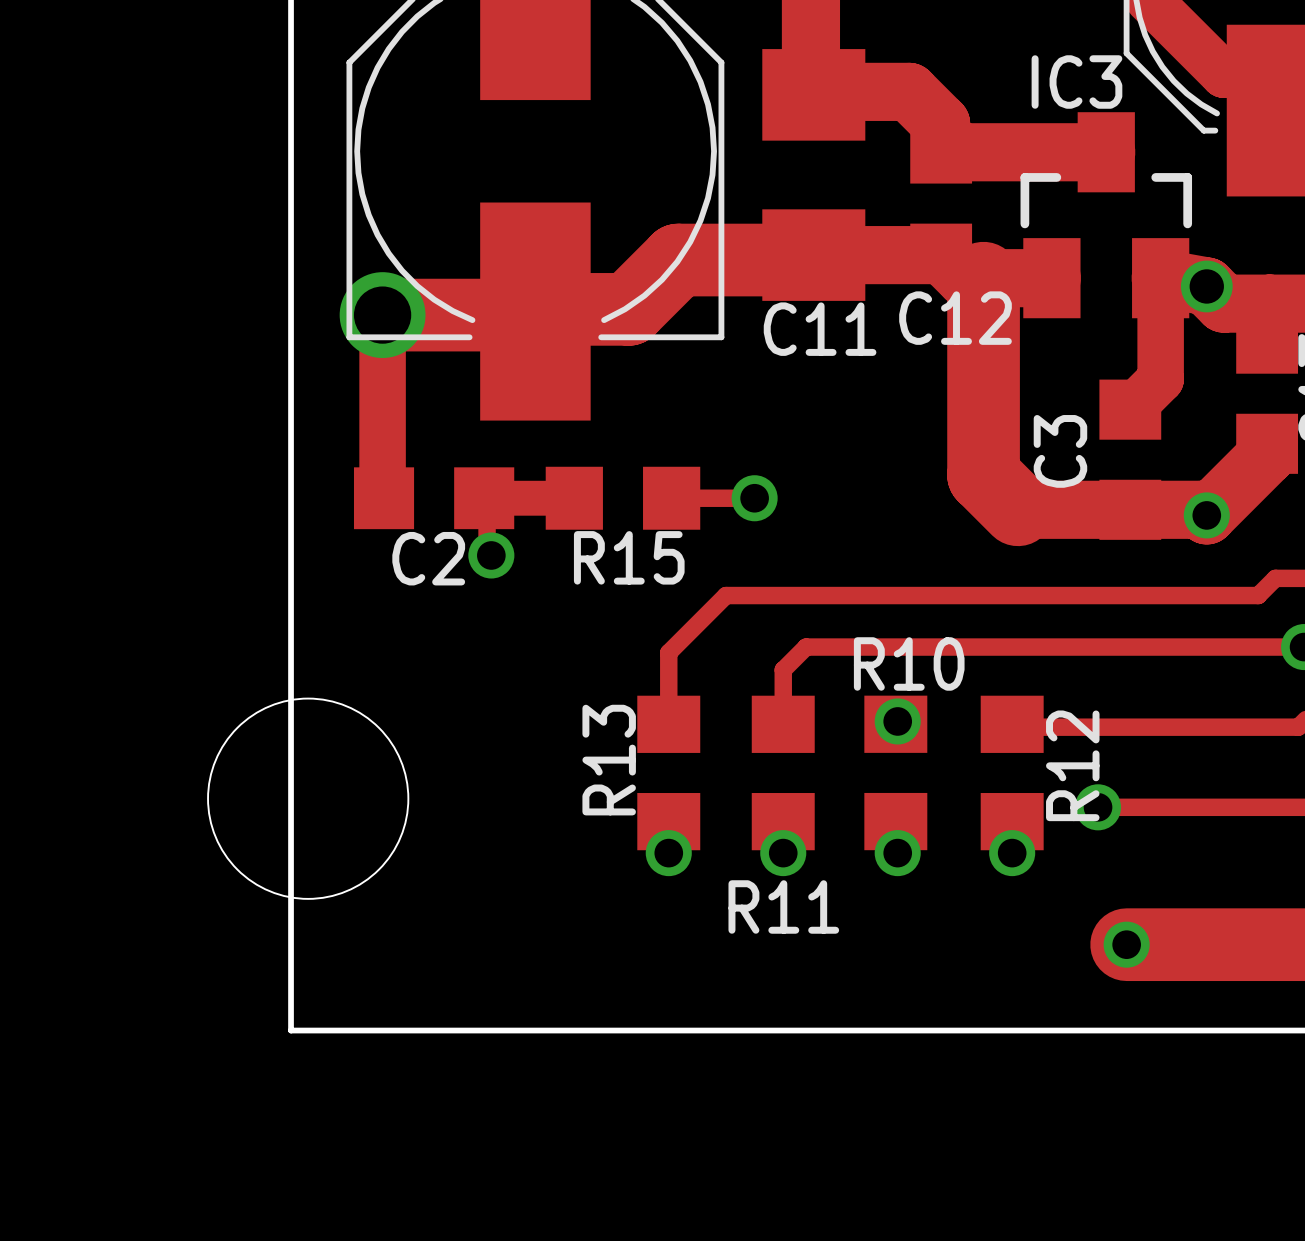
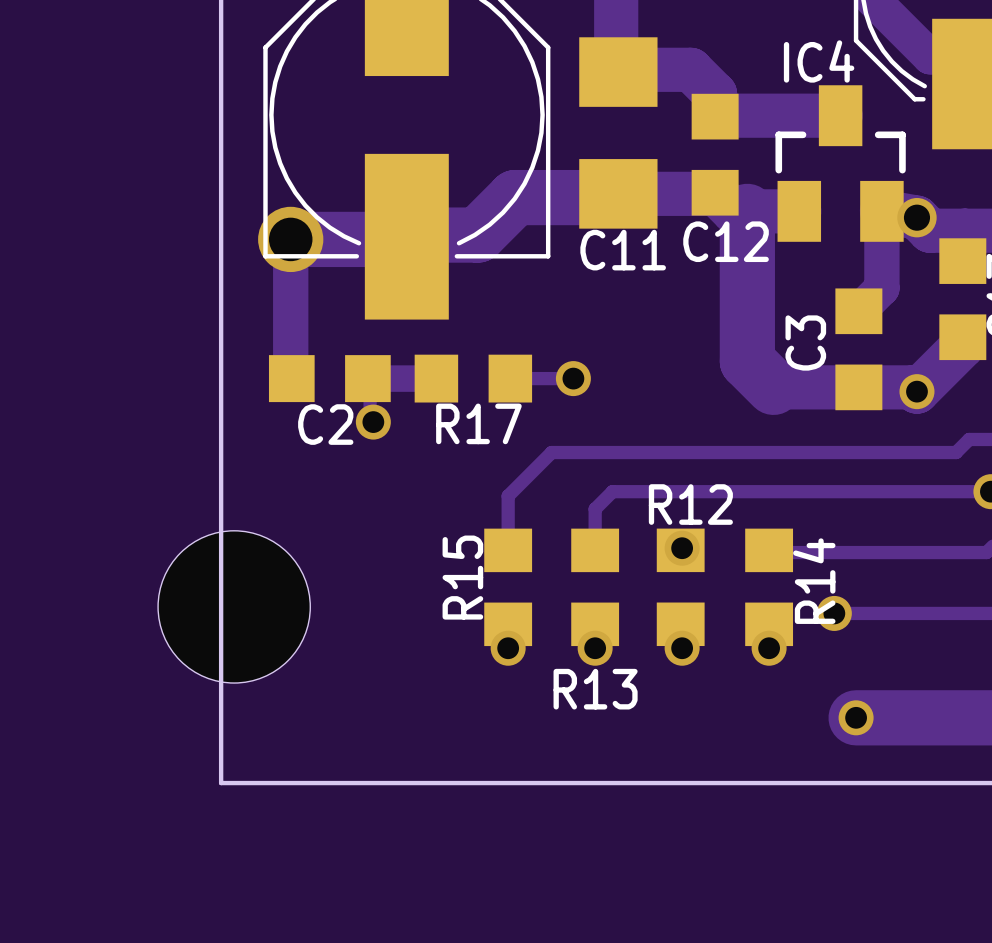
IC3 name: IC3 (1076, 82) -> IC4 (819, 61)
R15 name: R15 (629, 557) -> R17 (478, 423)
R10 name: R10 (909, 663) -> R12 (690, 504)
R13 name: R13 (609, 760) -> R15 (462, 577)
R12 name: R12 (1072, 765) -> R14 (814, 581)
R11 name: R11 (783, 906) -> R13 (595, 689)

